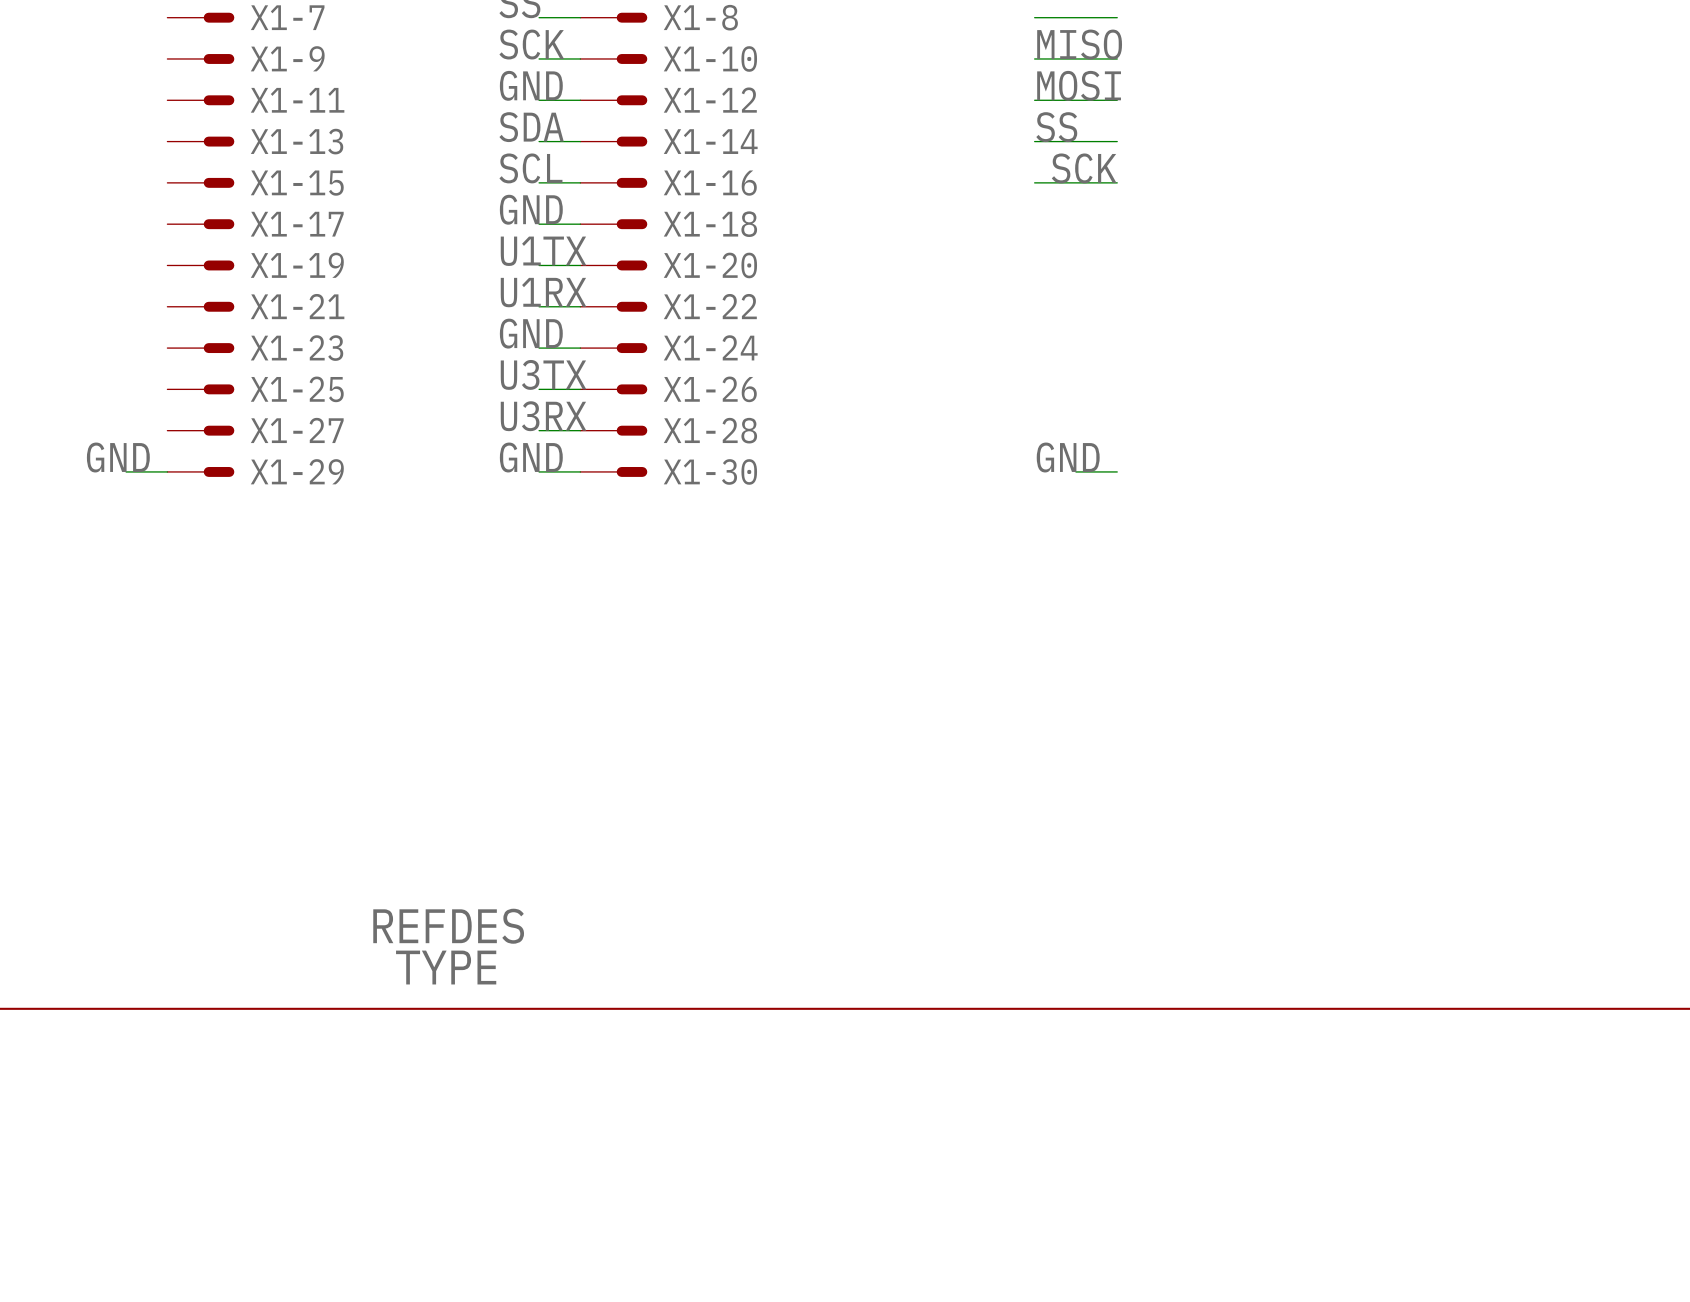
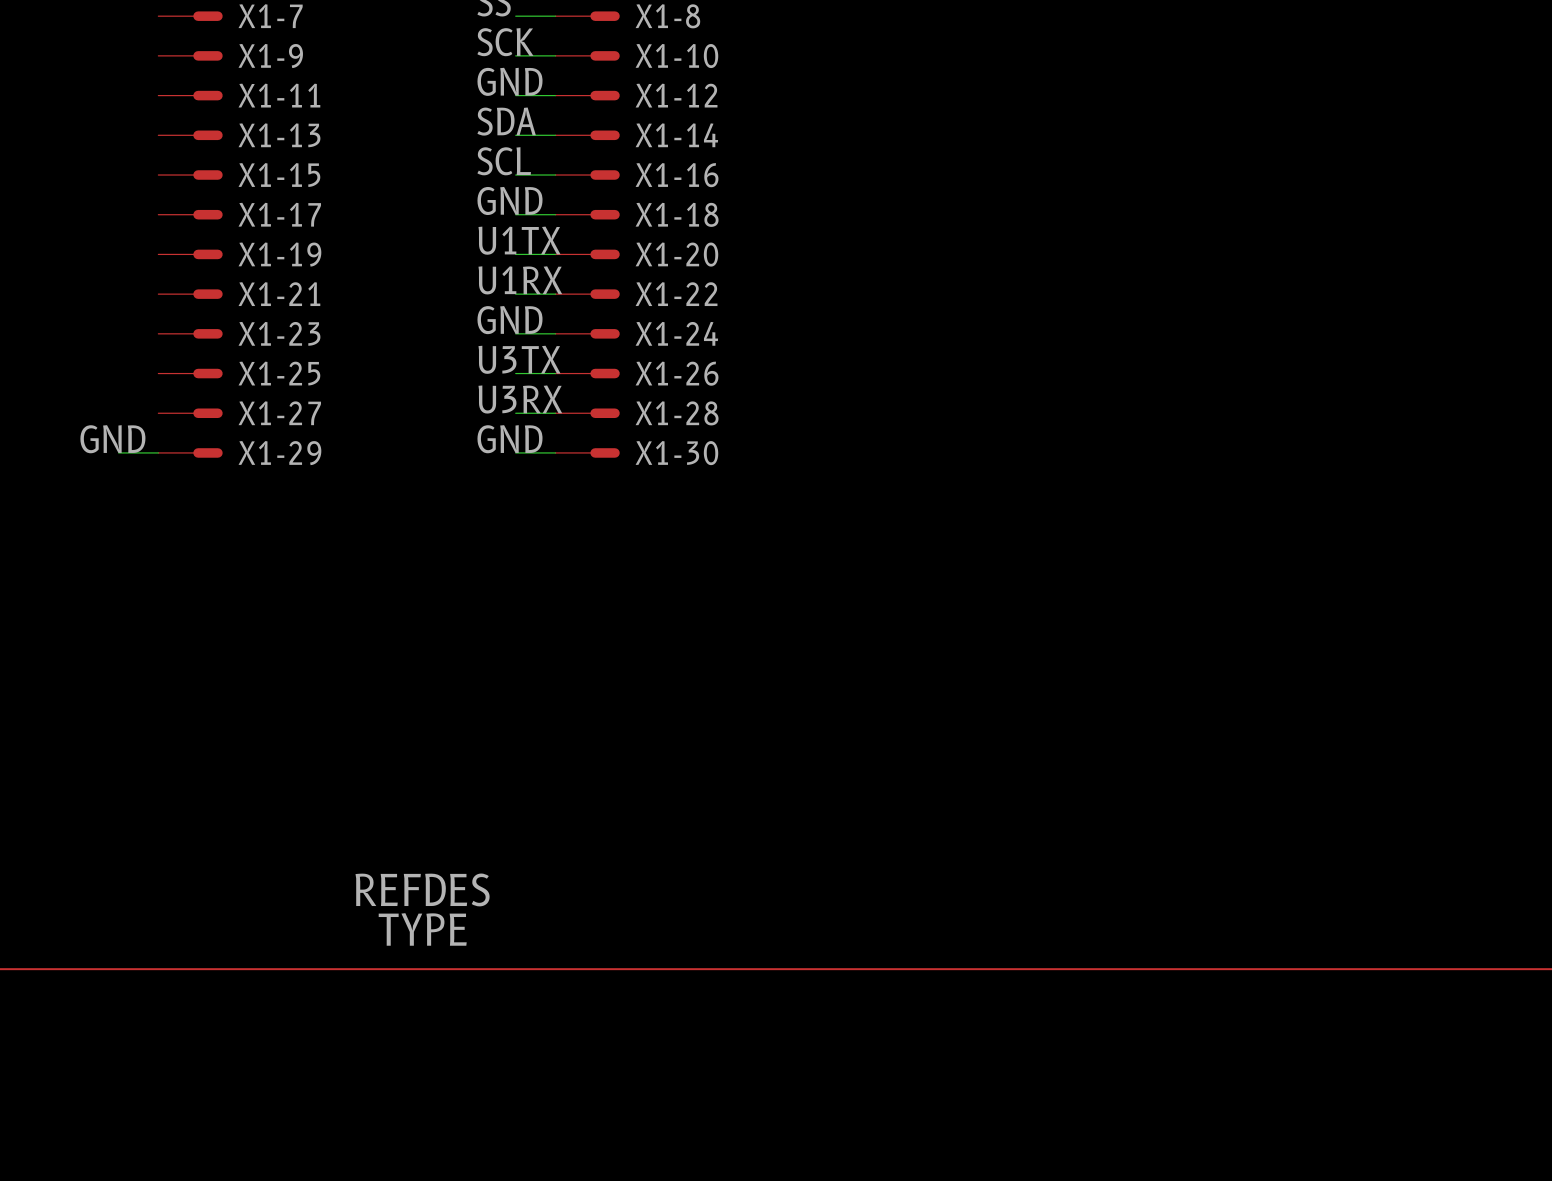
wire: (1034, 17) (1117, 17) -> none
label: MISO (1079, 44) -> none
wire: (1034, 58) (1117, 58) -> none
label: MOSI (1079, 85) -> none
wire: (1034, 100) (1117, 100) -> none
label: SS (1056, 127) -> none
wire: (1034, 141) (1117, 141) -> none
label: SCK (1084, 168) -> none
wire: (1034, 182) (1117, 182) -> none
label: GND (1068, 457) -> none
wire: (1075, 471) (1117, 471) -> none

